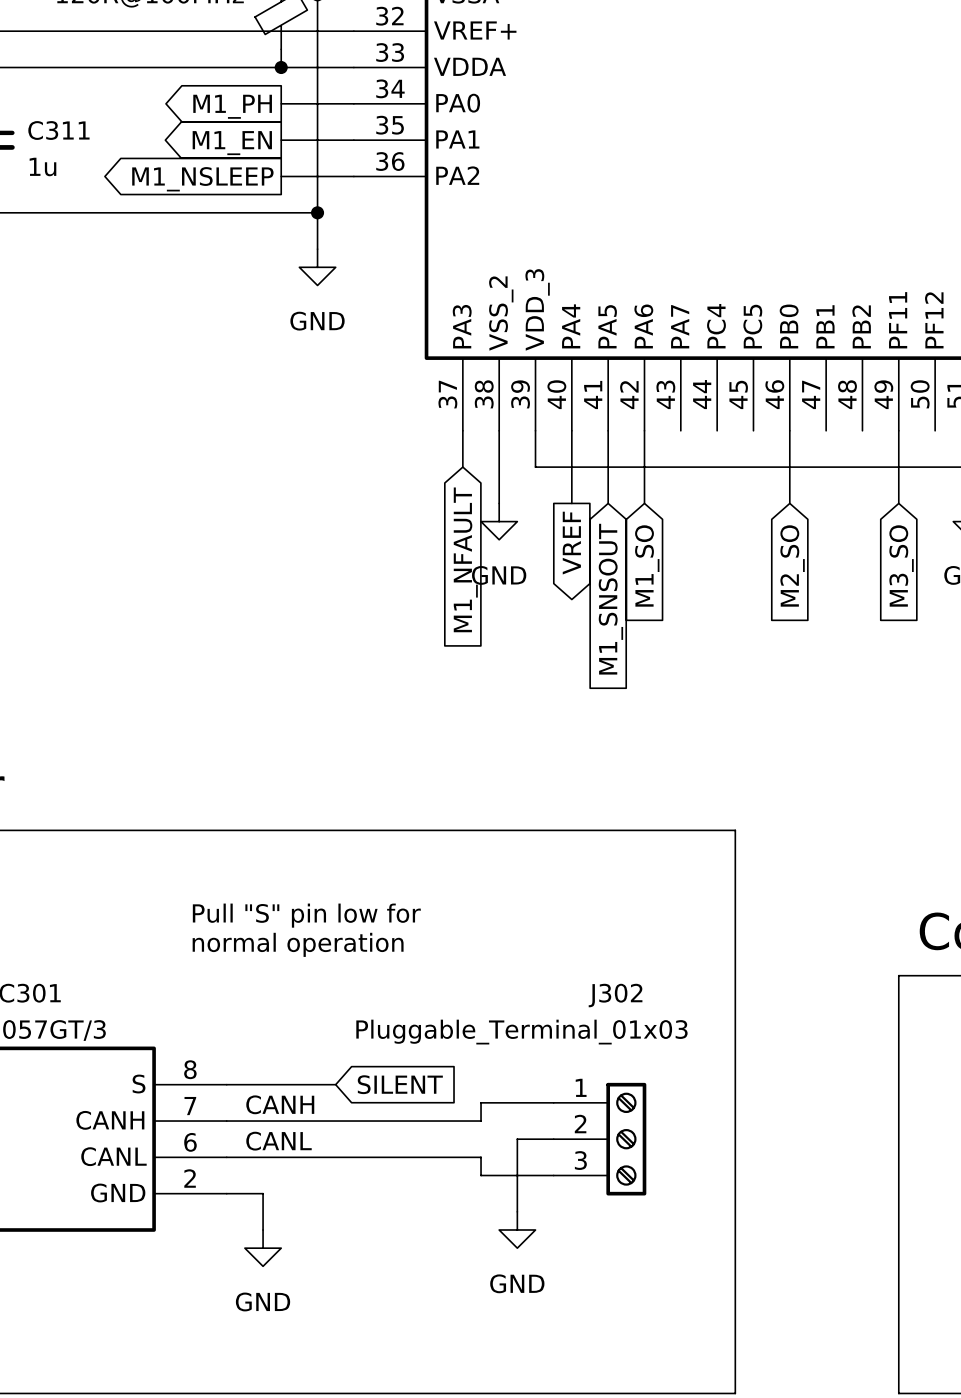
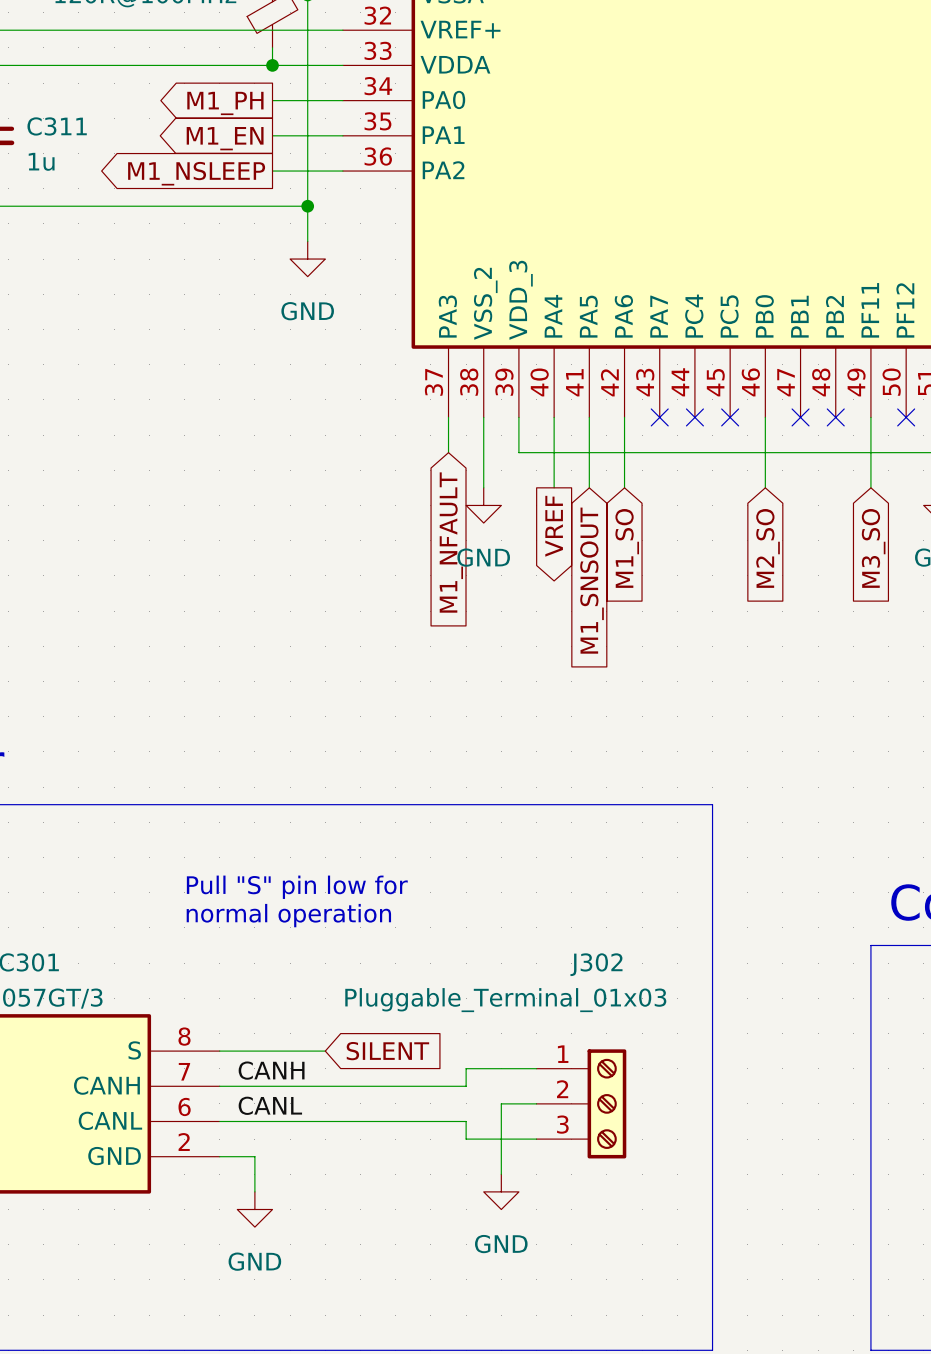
no-connect mark: none -> (659, 417)
no-connect mark: none -> (694, 417)
no-connect mark: none -> (730, 417)
no-connect mark: none -> (800, 417)
no-connect mark: none -> (835, 417)
no-connect mark: none -> (906, 417)

